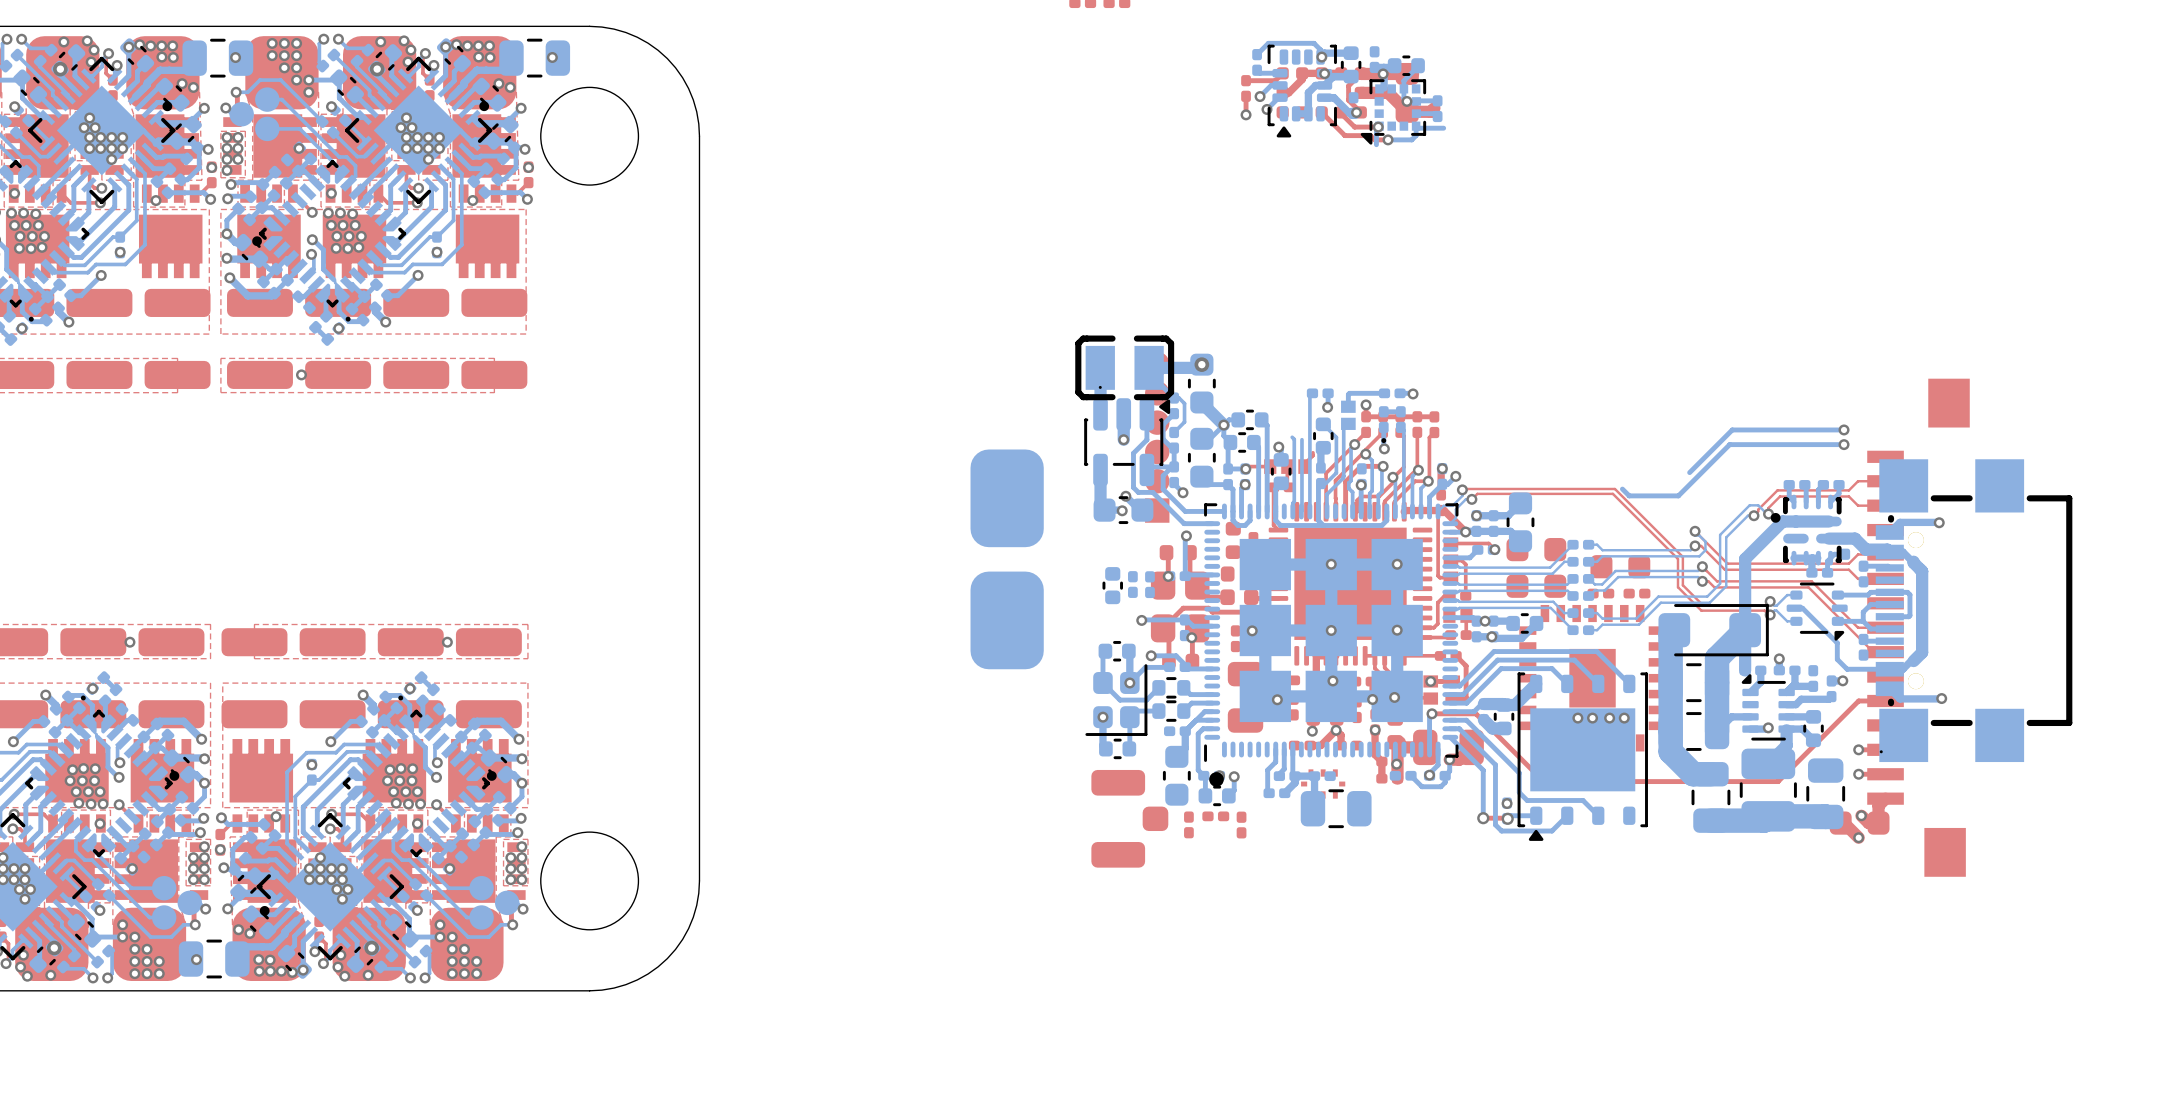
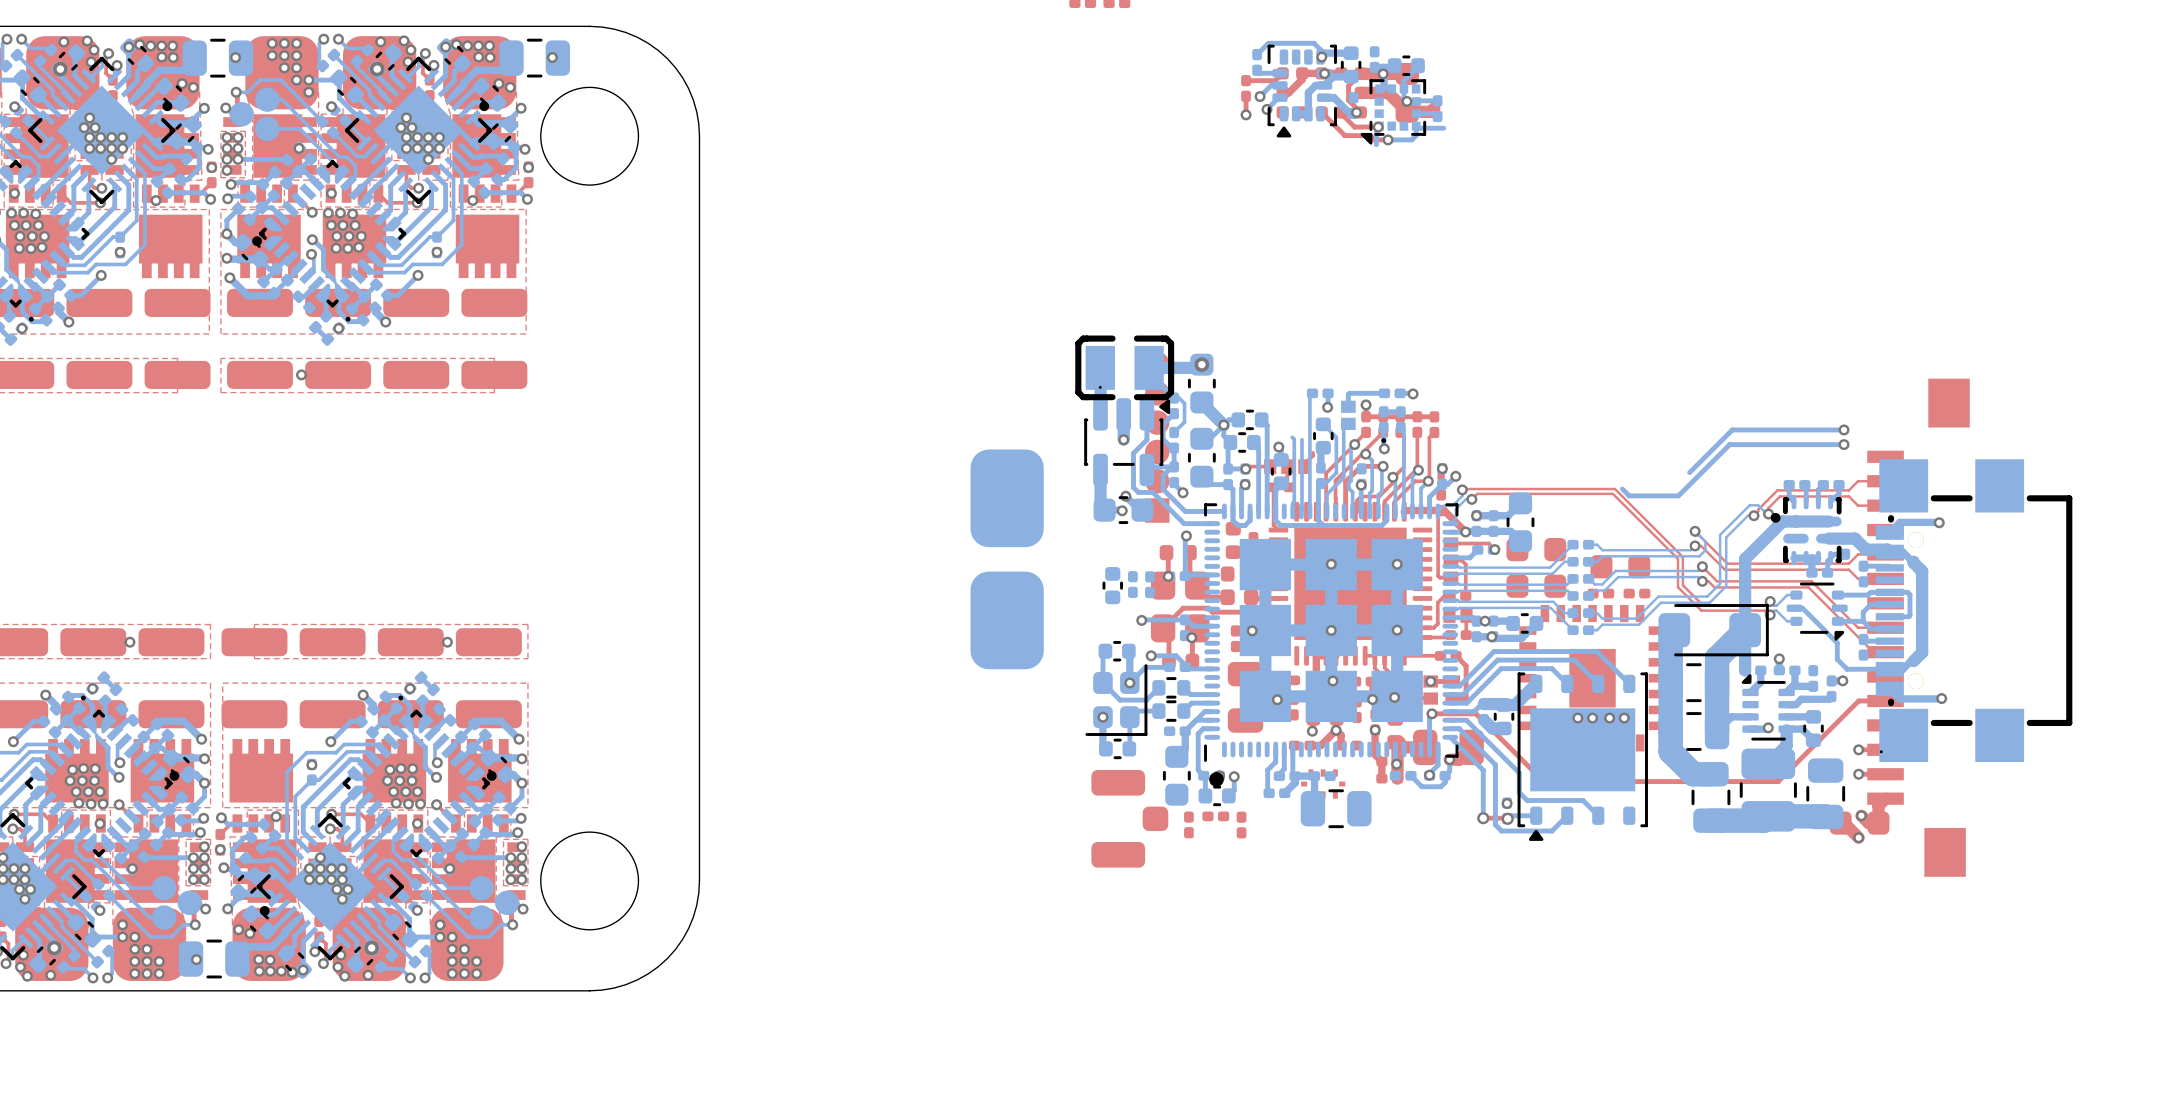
bottom track: none -> (238, 159) (287, 160)
bottom track: none -> (144, 857) (193, 857)
bottom track: none -> (461, 857) (510, 857)

